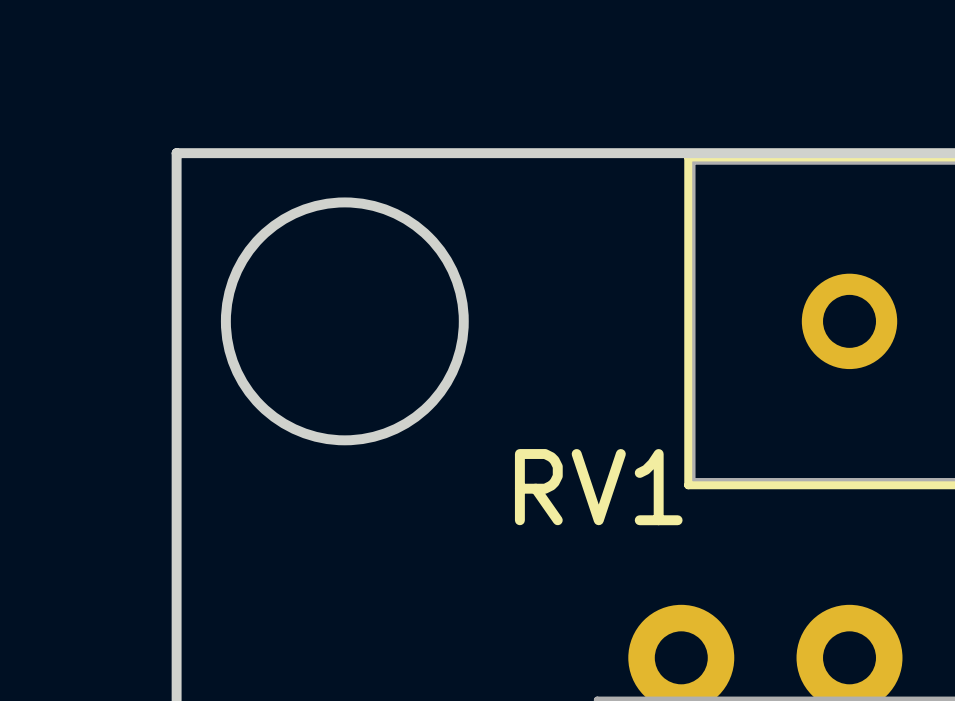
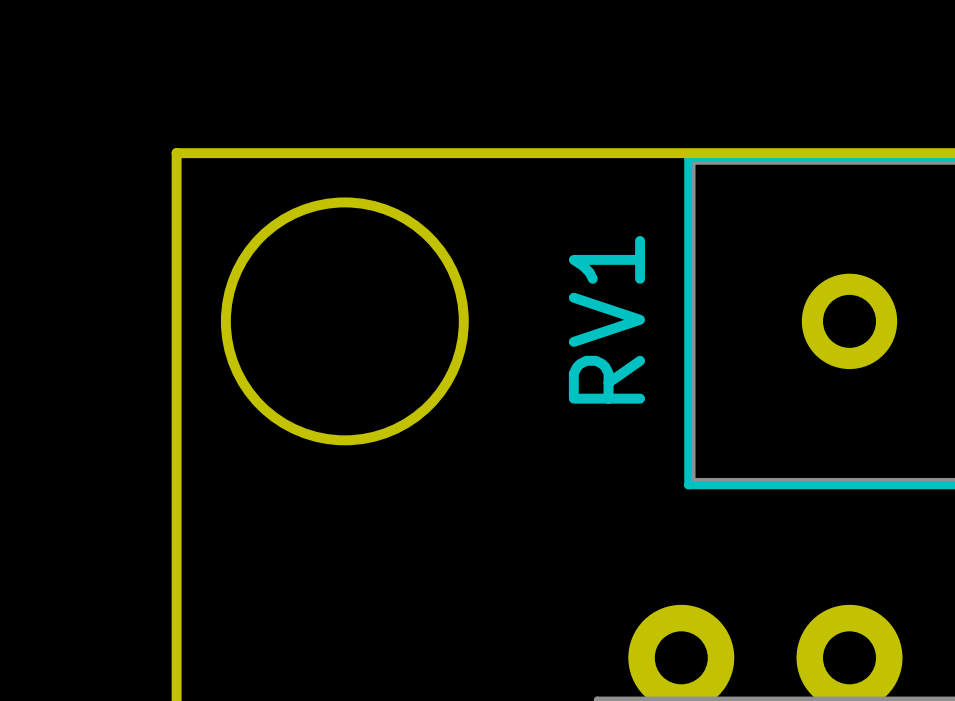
RV1 name rotation: 0° (598, 487) -> 90° counterclockwise (606, 319)

